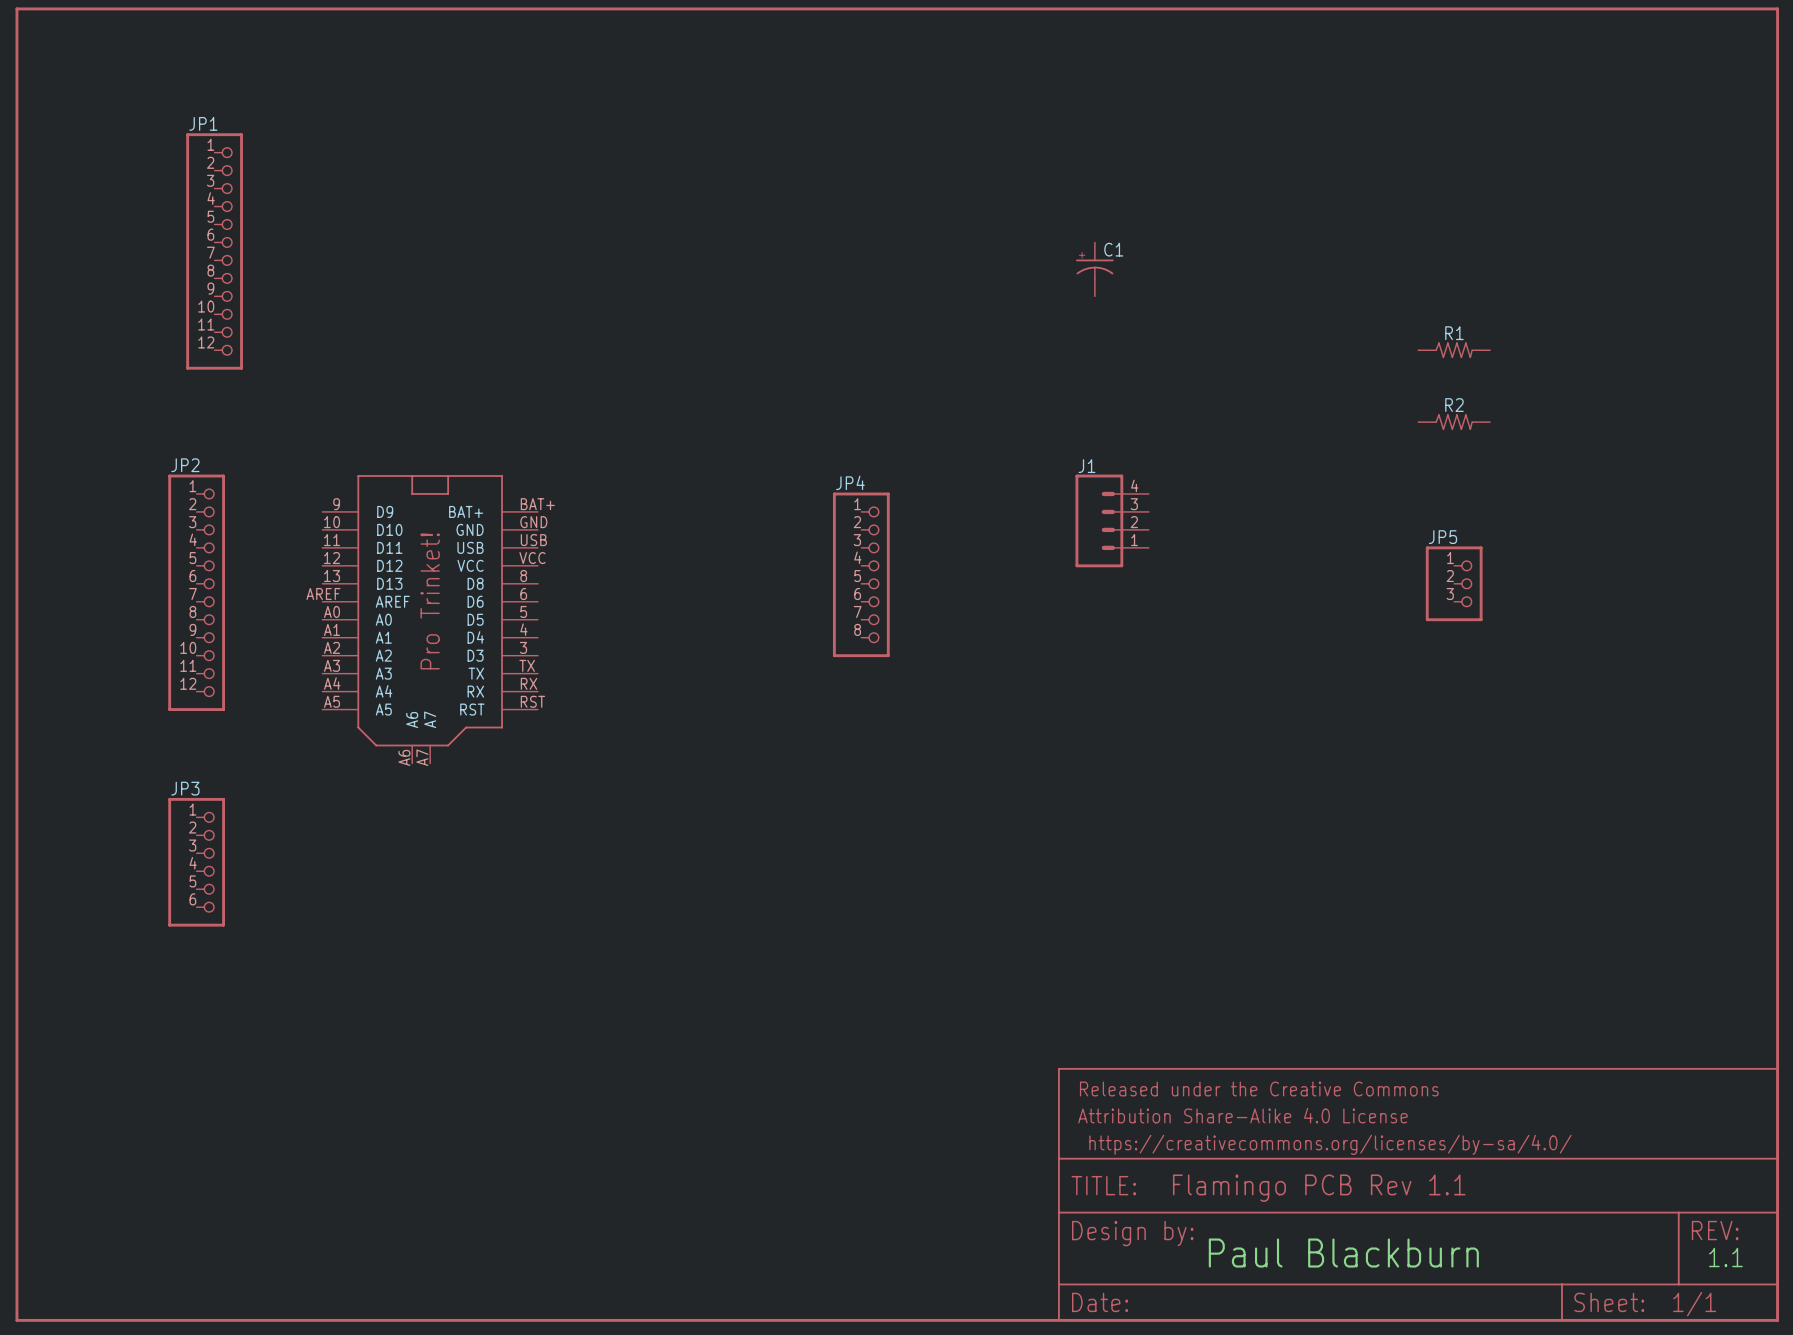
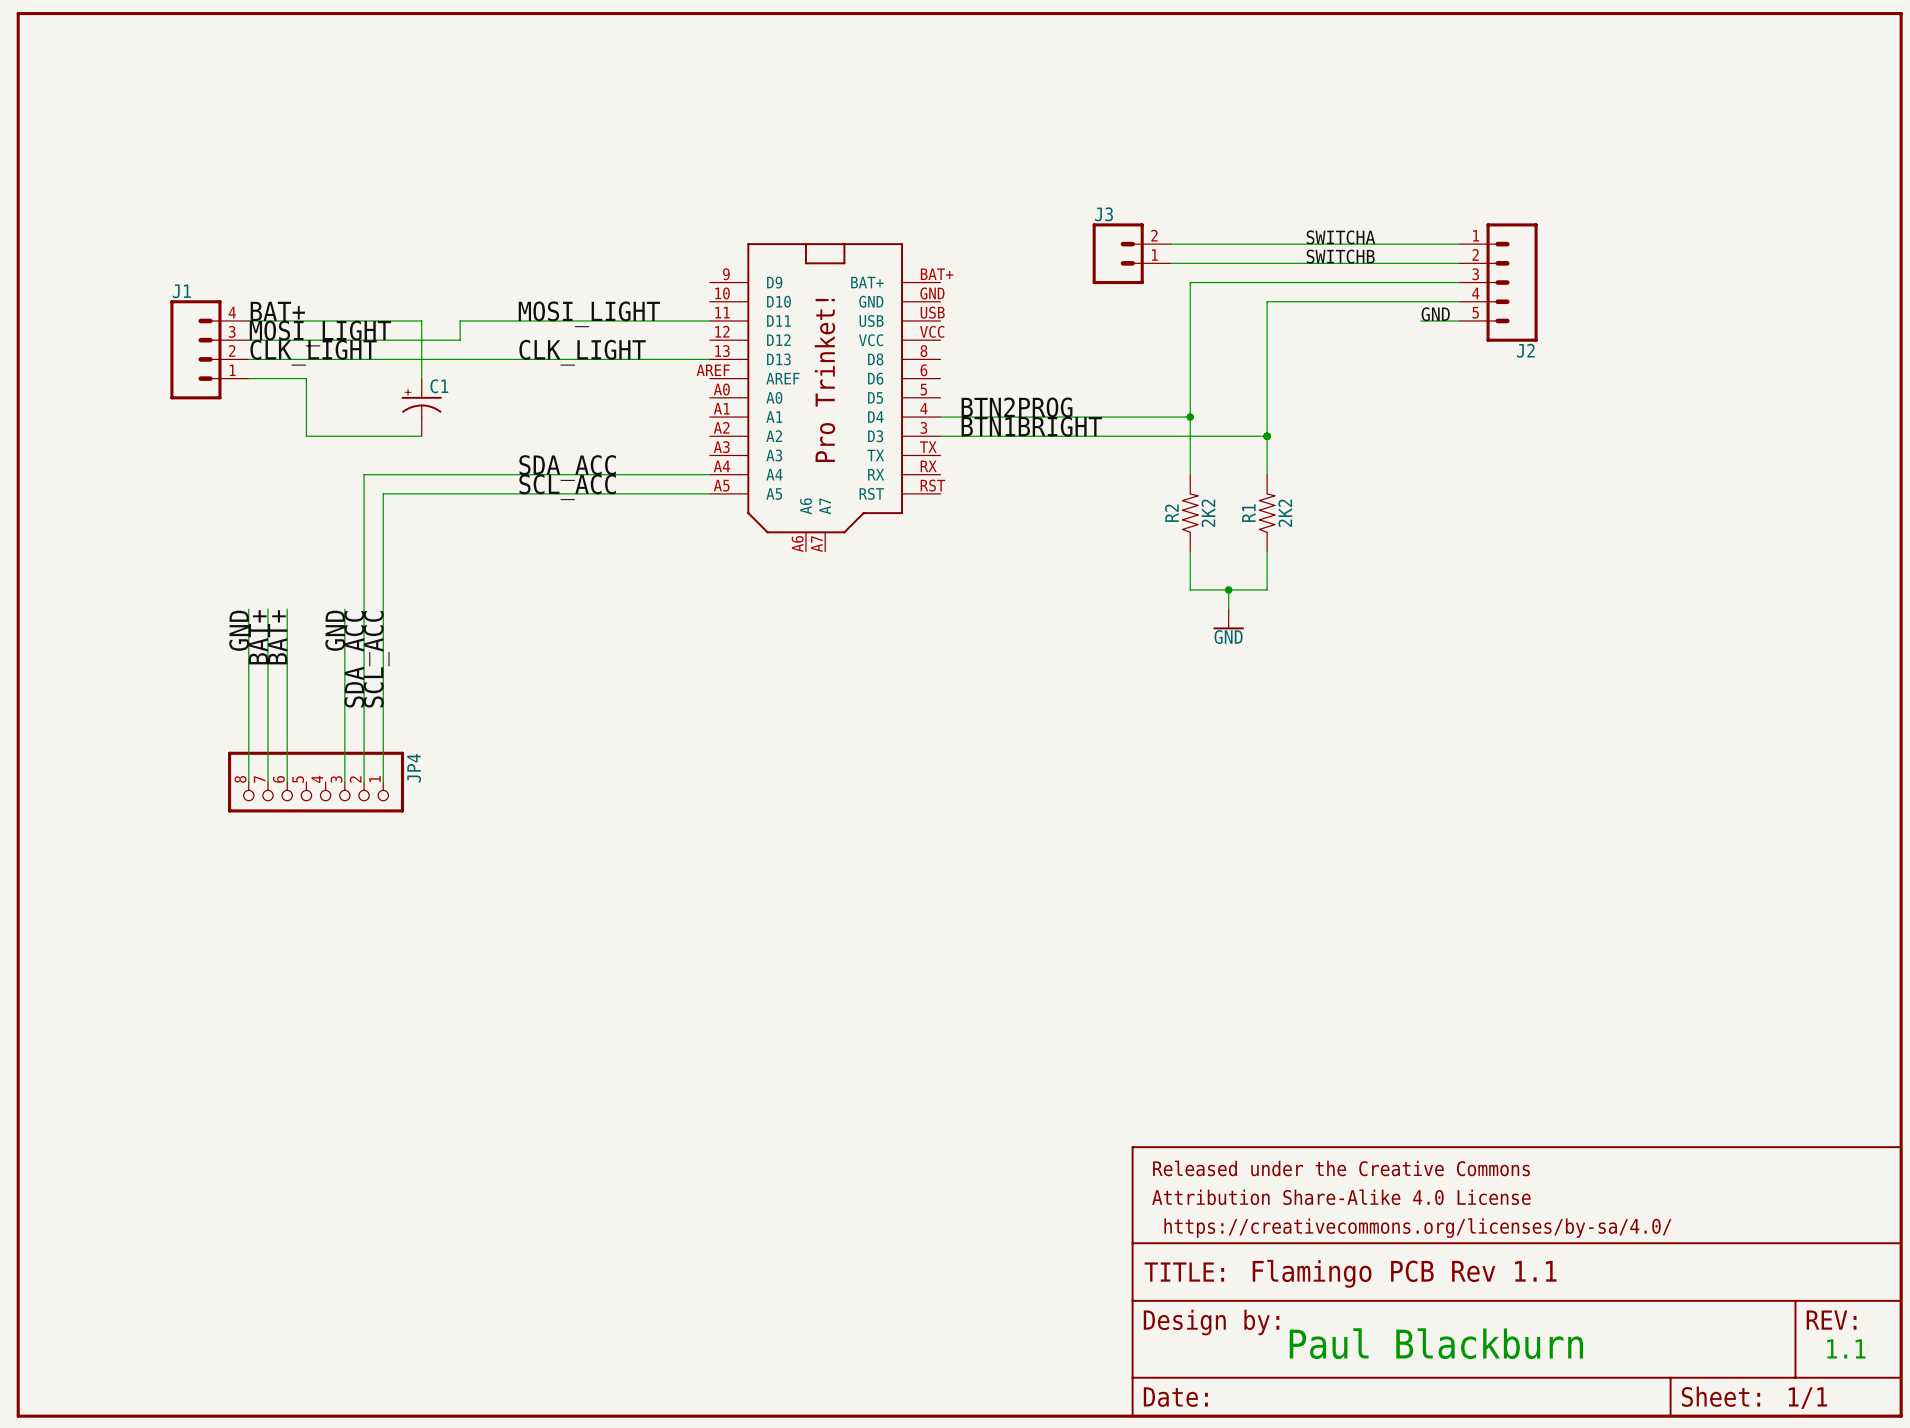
label: none -> SWITCHA (1340, 237)
wire: none -> (1171, 244) (1459, 244)
J3: none -> (1131, 253)
label: none -> SWITCHB (1340, 256)
wire: none -> (1171, 263) (1459, 263)
JP1: (214, 251) -> none
wire: none -> (1459, 282) (1190, 282) (1190, 474)
J2: none -> (1498, 282)
C1 position: (1094, 269) -> (421, 407)
wire: none -> (1459, 301) (1267, 301) (1267, 474)
label: none -> BAT+ (277, 311)
label: none -> MOSI_LIGHT (589, 314)
label: none -> GND (1435, 314)
wire: none -> (248, 320) (421, 320) (421, 378)
wire: none -> (709, 320) (460, 320) (460, 340) (248, 340)
wire: none -> (1420, 320) (1459, 320)
label: none -> MOSI_LIGHT (320, 333)
label: none -> CLK_LIGHT (313, 352)
label: none -> CLK_LIGHT (582, 352)
wire: none -> (248, 359) (709, 359)
wire: none -> (248, 378) (306, 378) (306, 436) (421, 436)
R1 rotation: 0° (1454, 350) -> 90° counterclockwise (1267, 513)
R1 position: (1454, 350) -> (1267, 513)
part: none -> (825, 397)
label: none -> BTN2PROG (1017, 407)
wire: none -> (940, 417) (1190, 417)
junction: none -> (1190, 417)
label: none -> BTN1BRIGHT (1031, 426)
wire: none -> (940, 436) (1267, 436)
junction: none -> (1267, 436)
R2 rotation: 0° (1454, 422) -> 90° counterclockwise (1190, 513)
R2 position: (1454, 422) -> (1190, 513)
label: none -> SDA_ACC (567, 468)
wire: none -> (709, 474) (364, 474) (364, 782)
label: none -> SCL_ACC (567, 487)
wire: none -> (709, 493) (383, 493) (383, 782)
R2 value: none -> 2K2 (1208, 513)
R1 value: none -> 2K2 (1285, 513)
wire: none -> (1190, 551) (1190, 589) (1267, 589) (1267, 551)
J1 position: (1112, 520) -> (209, 349)
wire: none -> (1228, 589) (1228, 609)
junction: none -> (1228, 589)
wire: none -> (248, 609) (248, 782)
wire: none -> (267, 609) (267, 782)
wire: none -> (287, 609) (287, 782)
wire: none -> (344, 609) (344, 782)
JP4 rotation: 0° (861, 574) -> 90° clockwise (316, 782)
JP4 position: (861, 574) -> (316, 782)
power symbol: none -> GND (1228, 619)
JP5: (1454, 583) -> none
label: none -> GND (239, 630)
label: none -> GND (335, 630)
JP2: (196, 592) -> none
label: none -> BAT+ (258, 637)
label: none -> BAT+ (277, 637)
label: none -> SDA_ACC (357, 659)
label: none -> SCL_ACC (376, 659)
part: (430, 619) -> none
JP3: (196, 862) -> none

